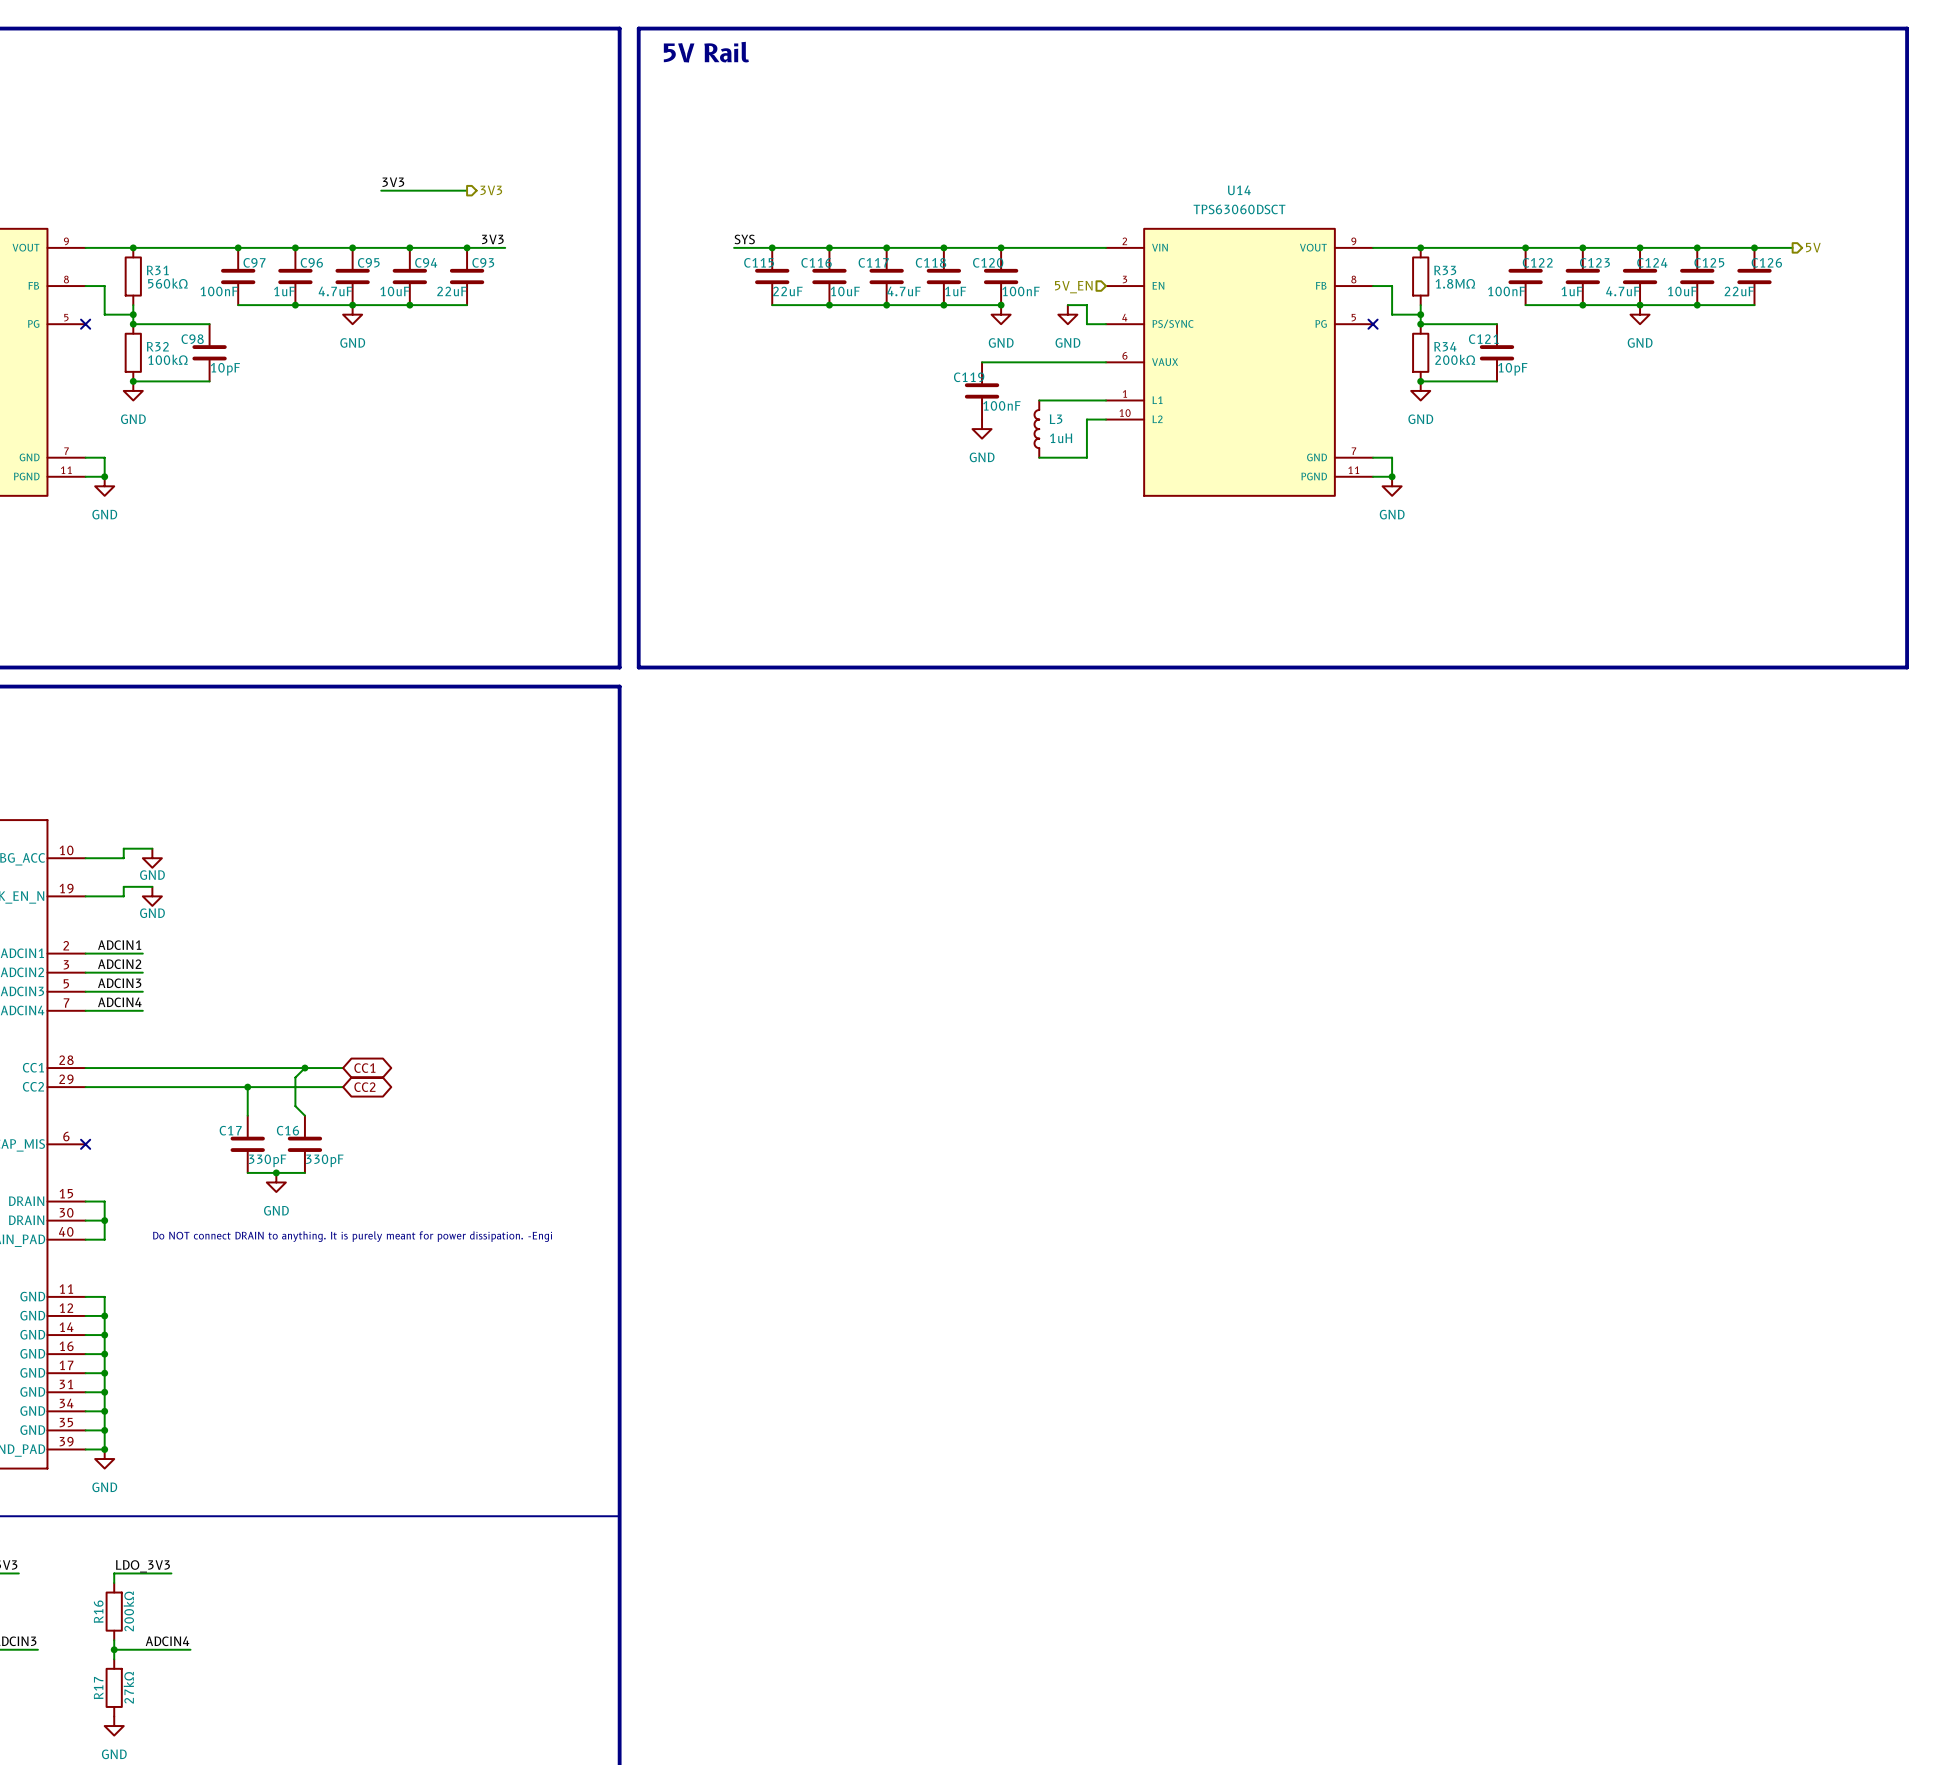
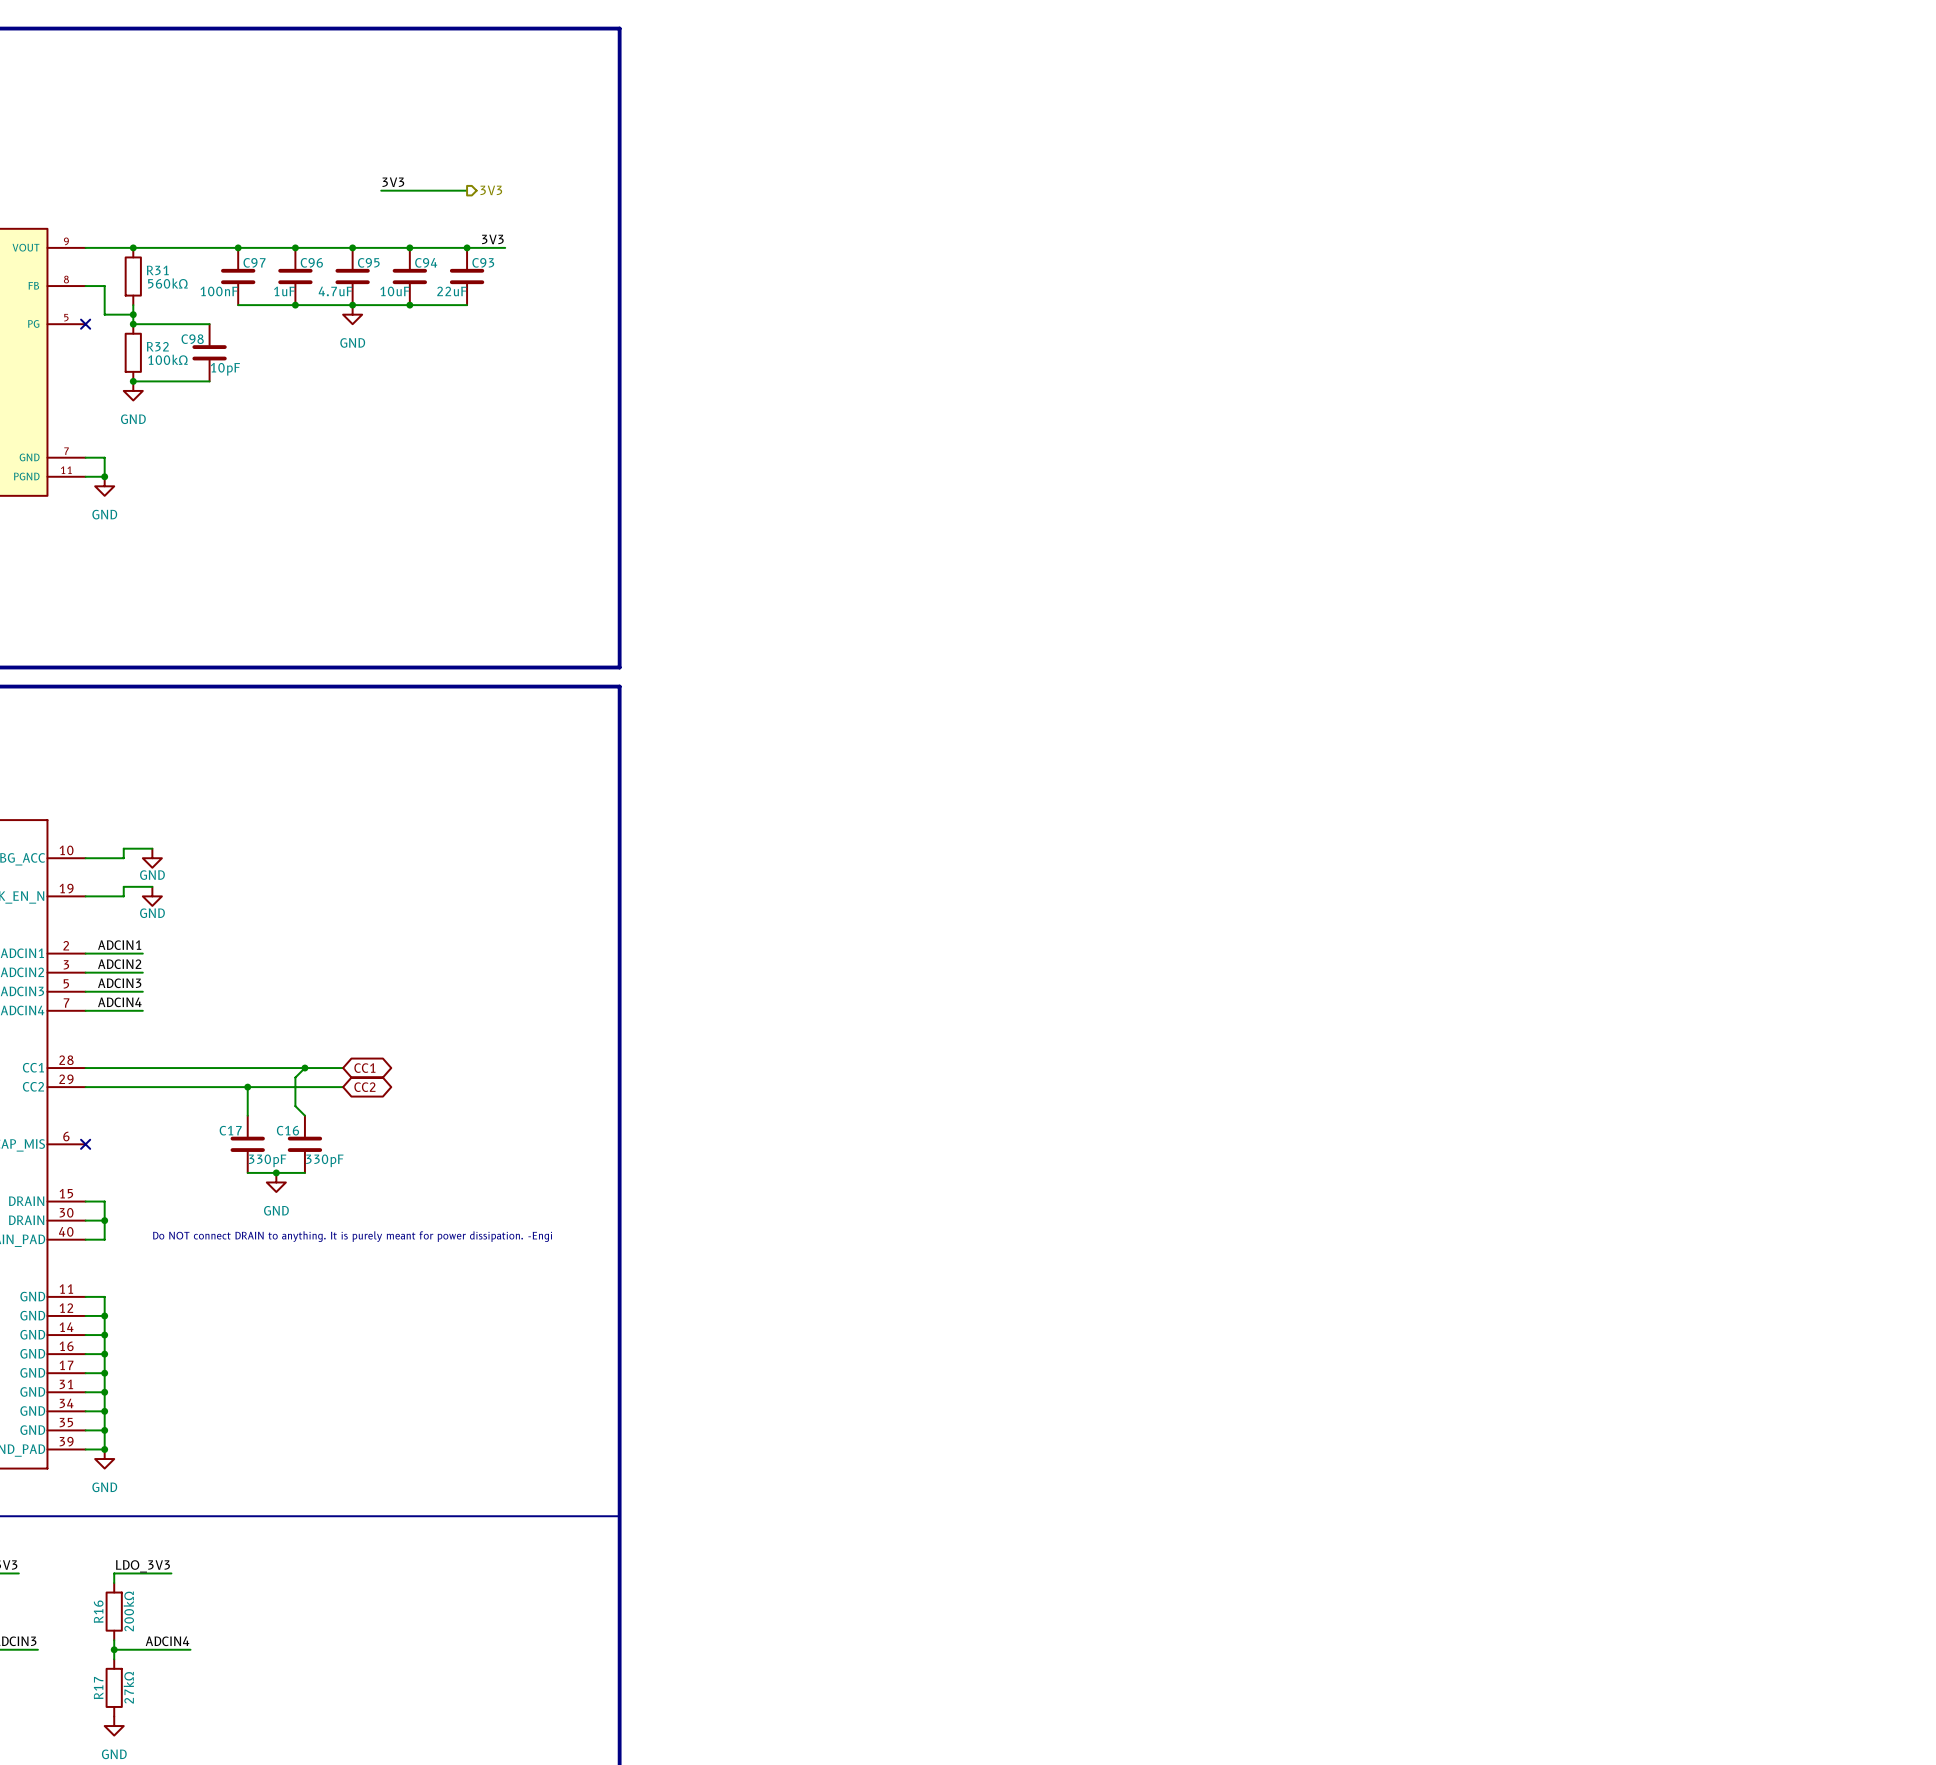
line: (638, 28) (1907, 28) (1907, 667) (638, 667) (638, 28) -> none
text: 5V Rail (706, 52) -> none
label: SYS (744, 239) -> none
wire: (734, 247) (1106, 247) -> none
junction: (772, 247) -> none
junction: (829, 247) -> none
junction: (886, 247) -> none
junction: (943, 247) -> none
junction: (1001, 247) -> none
wire: (1373, 247) (1792, 247) -> none
junction: (1420, 247) -> none
junction: (1525, 247) -> none
junction: (1582, 247) -> none
junction: (1640, 247) -> none
junction: (1697, 247) -> none
junction: (1754, 247) -> none
hierarchical label: 5V (1813, 247) -> none
C115: 22uF (772, 276) -> none
C116: 10uF (829, 276) -> none
C117: 4.7uF (886, 276) -> none
C118: 1uF (943, 276) -> none
C120: 100nF (1001, 276) -> none
R33: 1.8MΩ (1420, 276) -> none
C122: 100nF (1525, 276) -> none
C123: 1uF (1582, 276) -> none
C124: 4.7uF (1640, 276) -> none
C125: 10uF (1697, 276) -> none
C126: 22uF (1754, 276) -> none
wire: (1373, 286) (1392, 286) (1392, 314) (1420, 314) -> none
hierarchical label: 5V_EN (1073, 287) -> none
wire: (772, 305) (1001, 305) -> none
junction: (829, 305) -> none
junction: (886, 305) -> none
junction: (943, 305) -> none
junction: (1001, 305) -> none
wire: (1067, 305) (1086, 305) (1086, 324) (1106, 324) -> none
wire: (1420, 305) (1420, 324) (1497, 324) -> none
wire: (1525, 305) (1754, 305) -> none
junction: (1582, 305) -> none
junction: (1640, 305) -> none
junction: (1697, 305) -> none
power symbol: GND (1001, 314) -> none
power symbol: GND (1067, 314) -> none
junction: (1420, 314) -> none
power symbol: GND (1640, 314) -> none
no-connect mark: (1373, 324) -> none
junction: (1420, 324) -> none
R34: 200kΩ (1420, 352) -> none
C121: 10pF (1497, 352) -> none
wire: (982, 362) (1106, 362) -> none
U14: TPS63060DSCT (1239, 362) -> none
wire: (1420, 381) (1497, 381) -> none
junction: (1420, 381) -> none
C119: 100nF (982, 390) -> none
power symbol: GND (1420, 390) -> none
wire: (1039, 400) (1106, 400) -> none
wire: (1106, 419) (1086, 419) (1086, 457) (1039, 457) -> none
power symbol: GND (982, 429) -> none
L3: 1uH (1036, 429) -> none
wire: (1373, 457) (1392, 457) (1392, 476) (1373, 476) -> none
junction: (1392, 476) -> none
power symbol: GND (1392, 486) -> none

